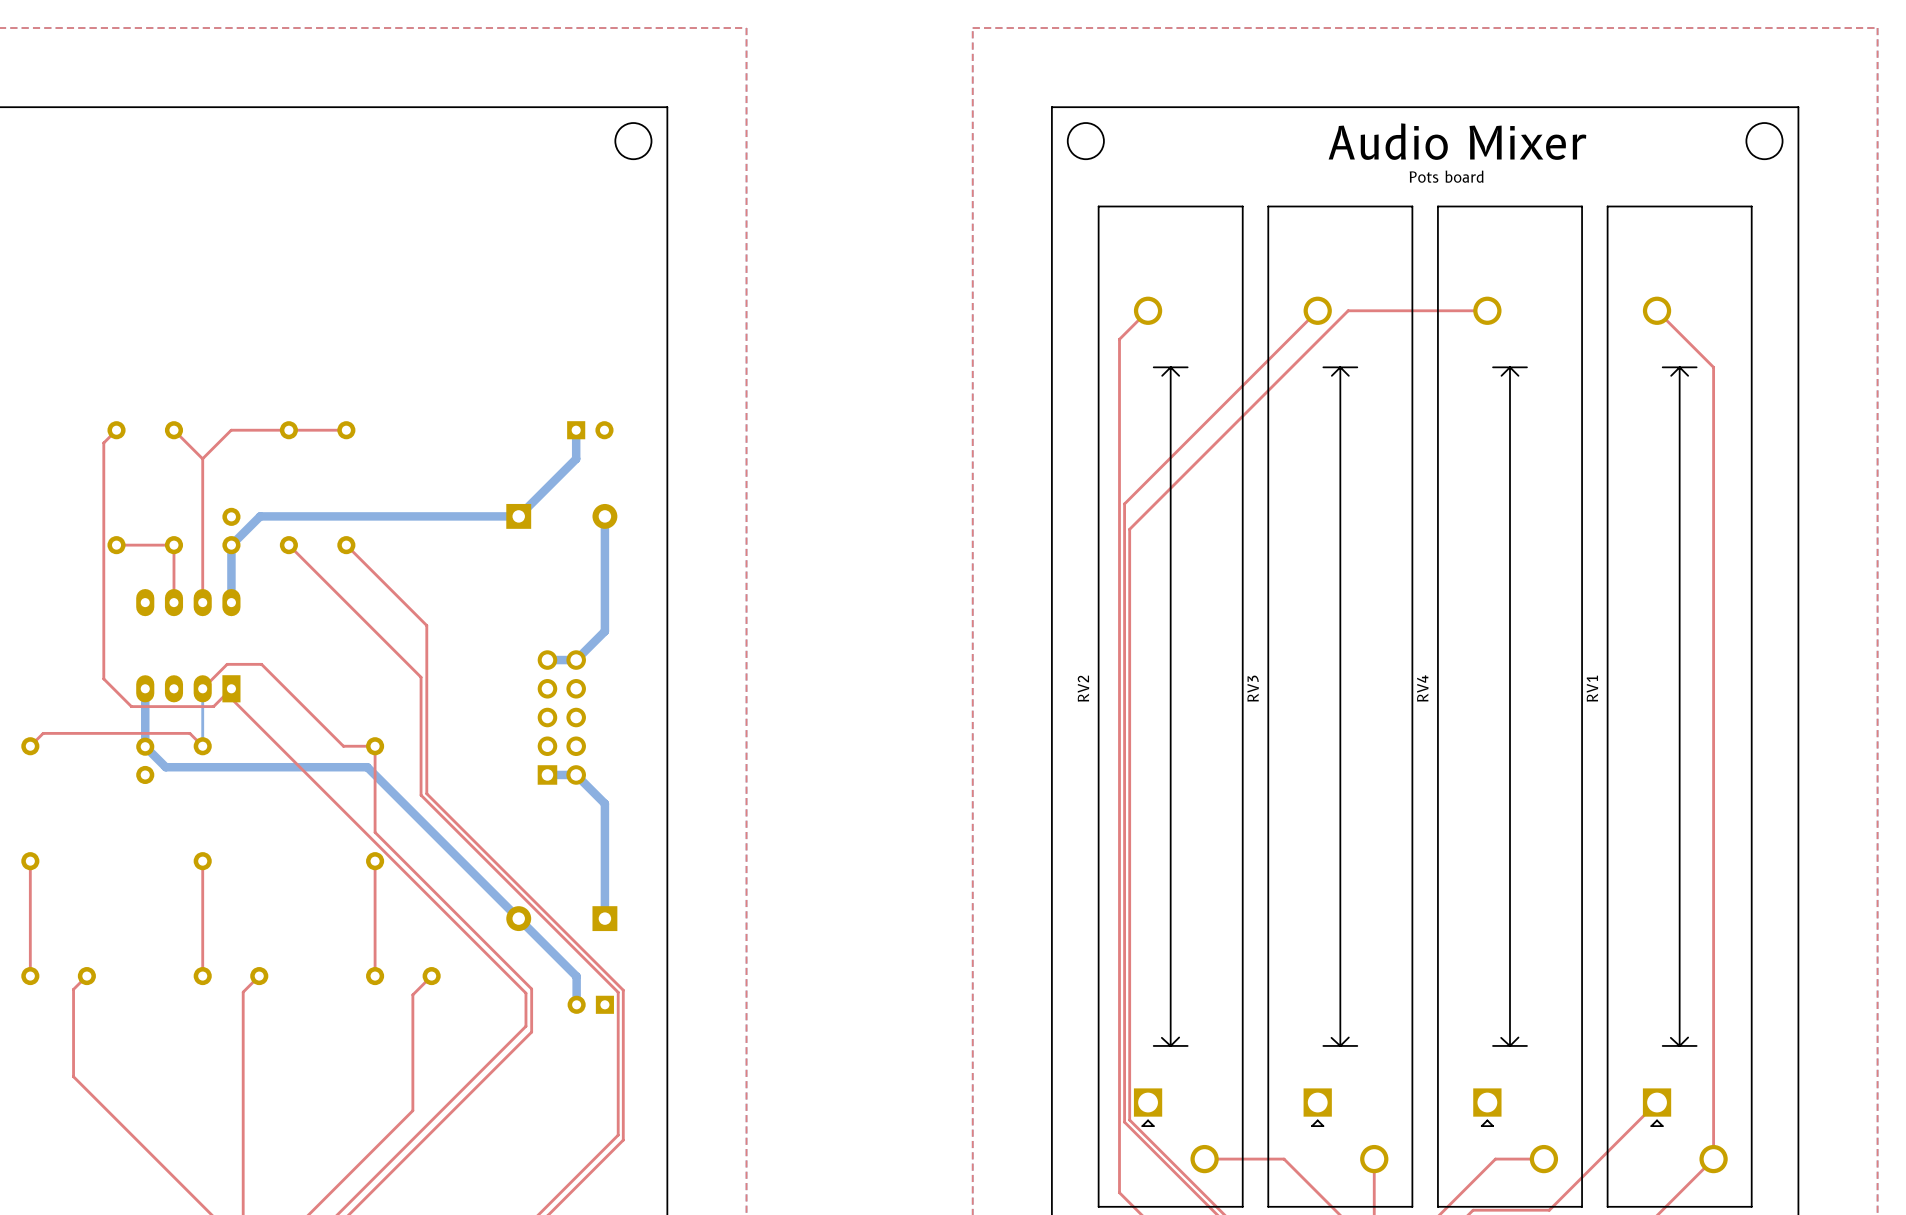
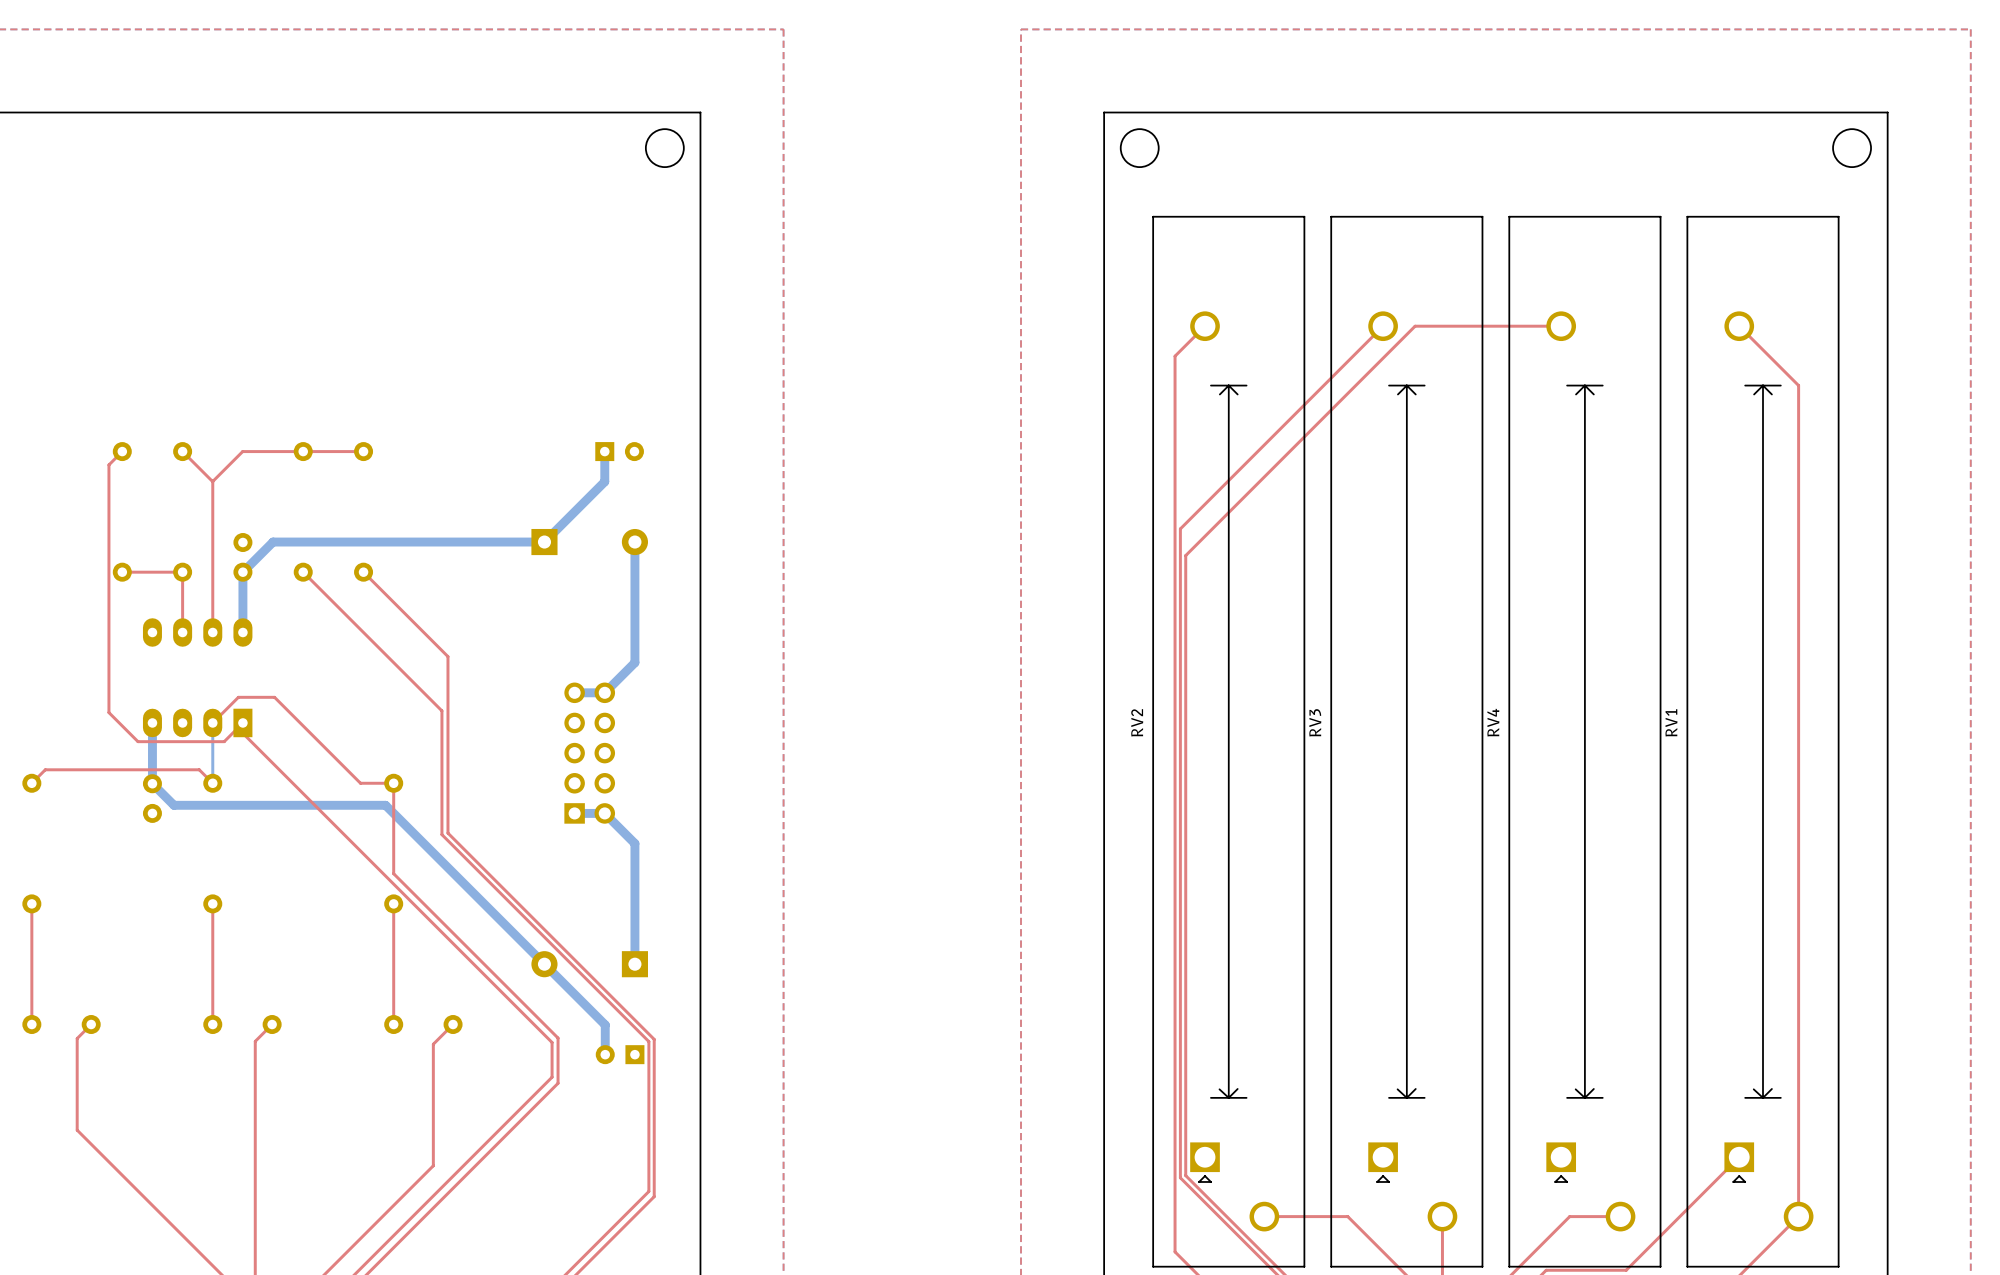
text: Audio Mixer (1457, 141) -> none
text: Pots board (1446, 176) -> none

